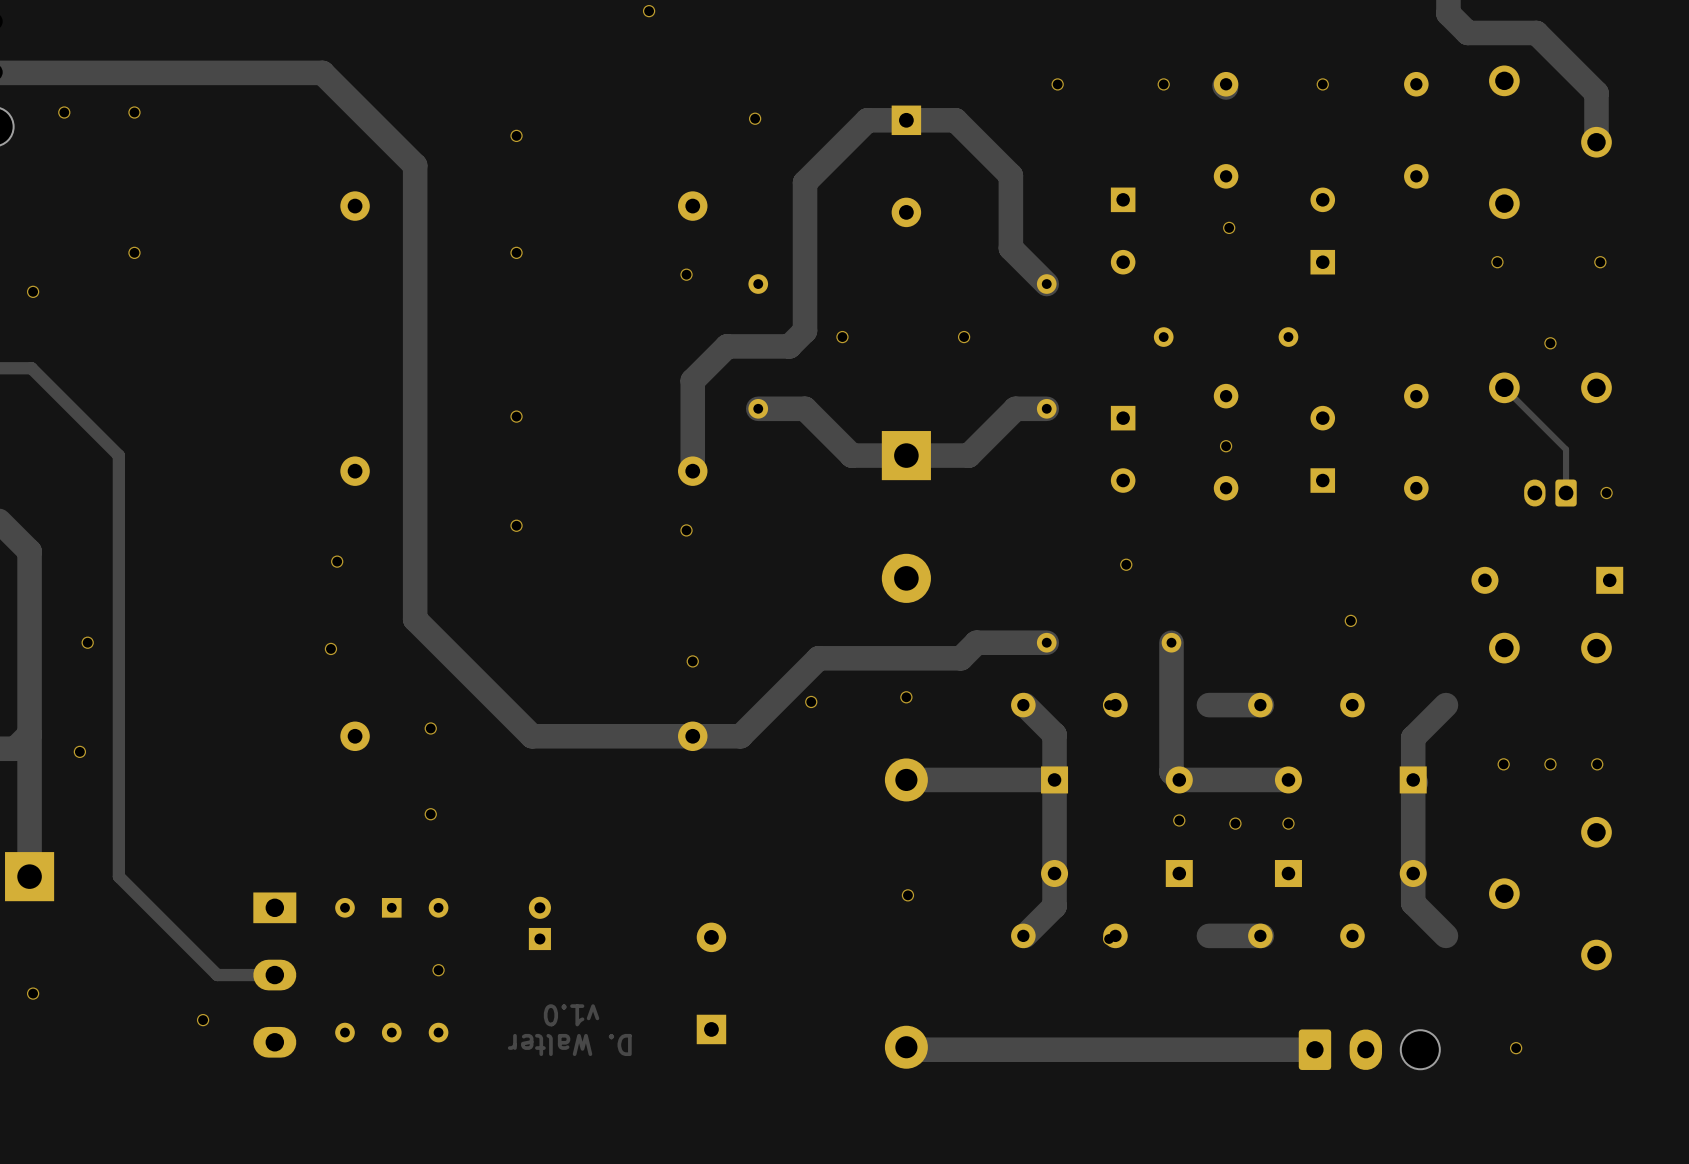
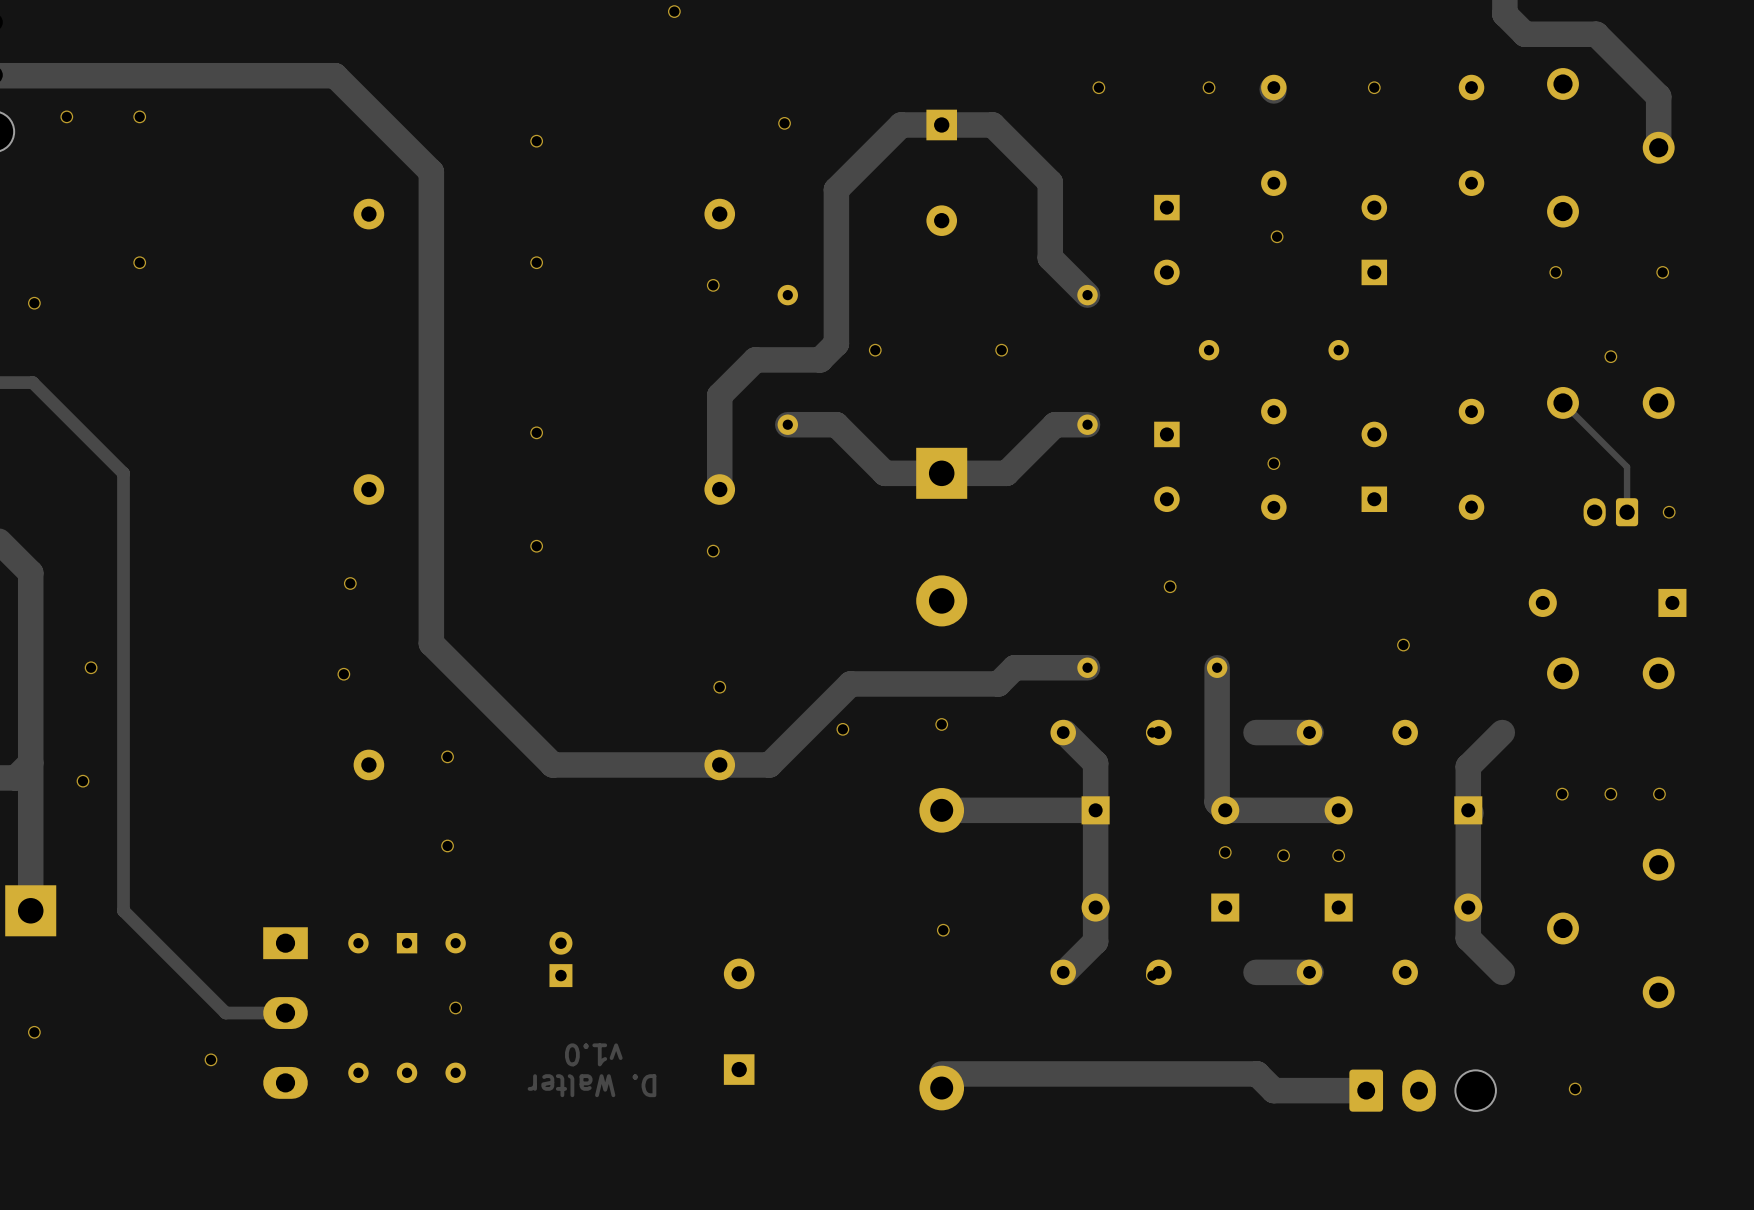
track: (906, 1047) (908, 1049) (1226, 1049) -> (941, 1073) (1257, 1073) (1273, 1090)

